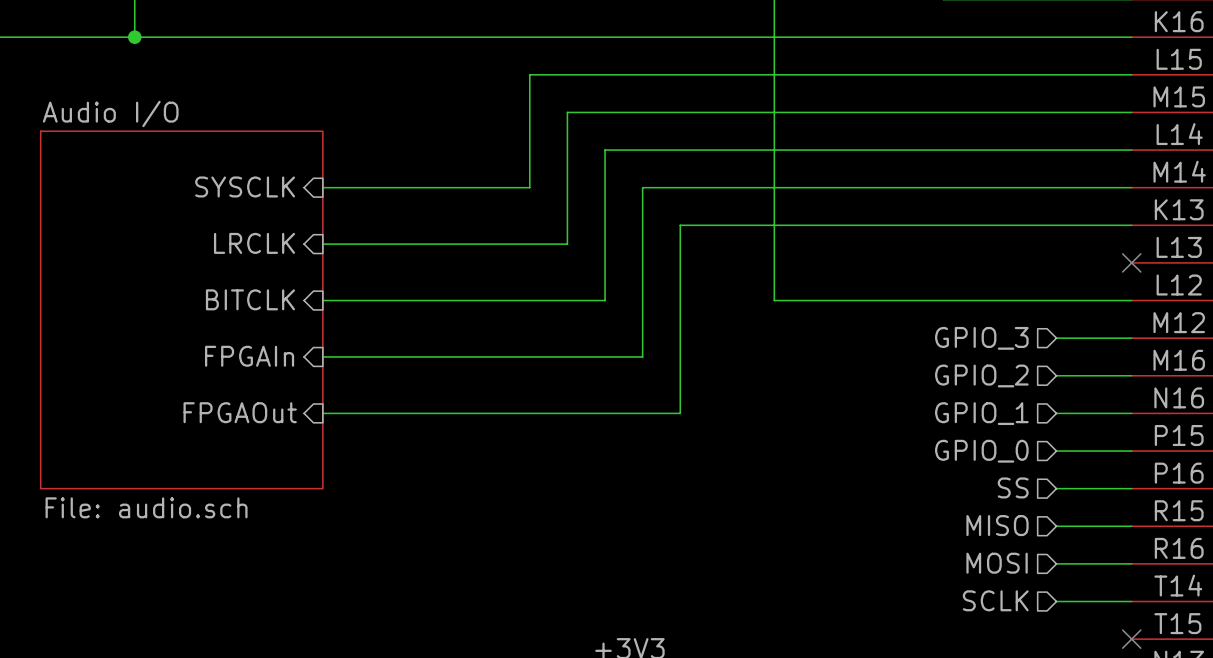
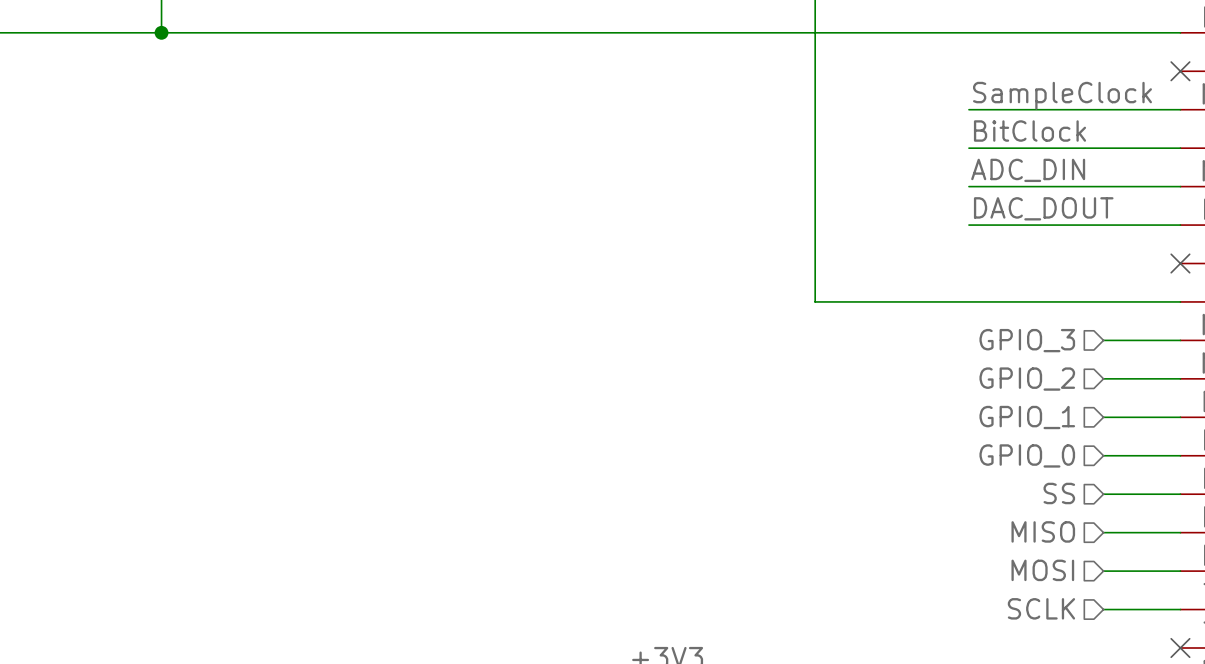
wire: (1131, 74) (529, 74) (529, 187) (322, 187) -> none
no-connect mark: none -> (1180, 71)
label: none -> SampleClock (1062, 95)
wire: (924, 112) (567, 112) (567, 244) (322, 244) -> none
label: none -> BitClock (1029, 131)
wire: (924, 150) (605, 150) (605, 300) (322, 300) -> none
label: none -> ADC_DIN (1028, 170)
sheet pin: SYSCLK (245, 186) -> none
wire: (924, 187) (642, 187) (642, 356) (322, 356) -> none
label: none -> DAC_DOUT (1043, 208)
wire: (924, 225) (680, 225) (680, 413) (322, 413) -> none
sheet pin: LRCLK (254, 243) -> none
sheet pin: BITCLK (250, 299) -> none
sheet Audio I/O: File: audio.sch (181, 309) -> none
sheet pin: FPGAIn (249, 356) -> none
sheet pin: FPGAOut (240, 412) -> none

